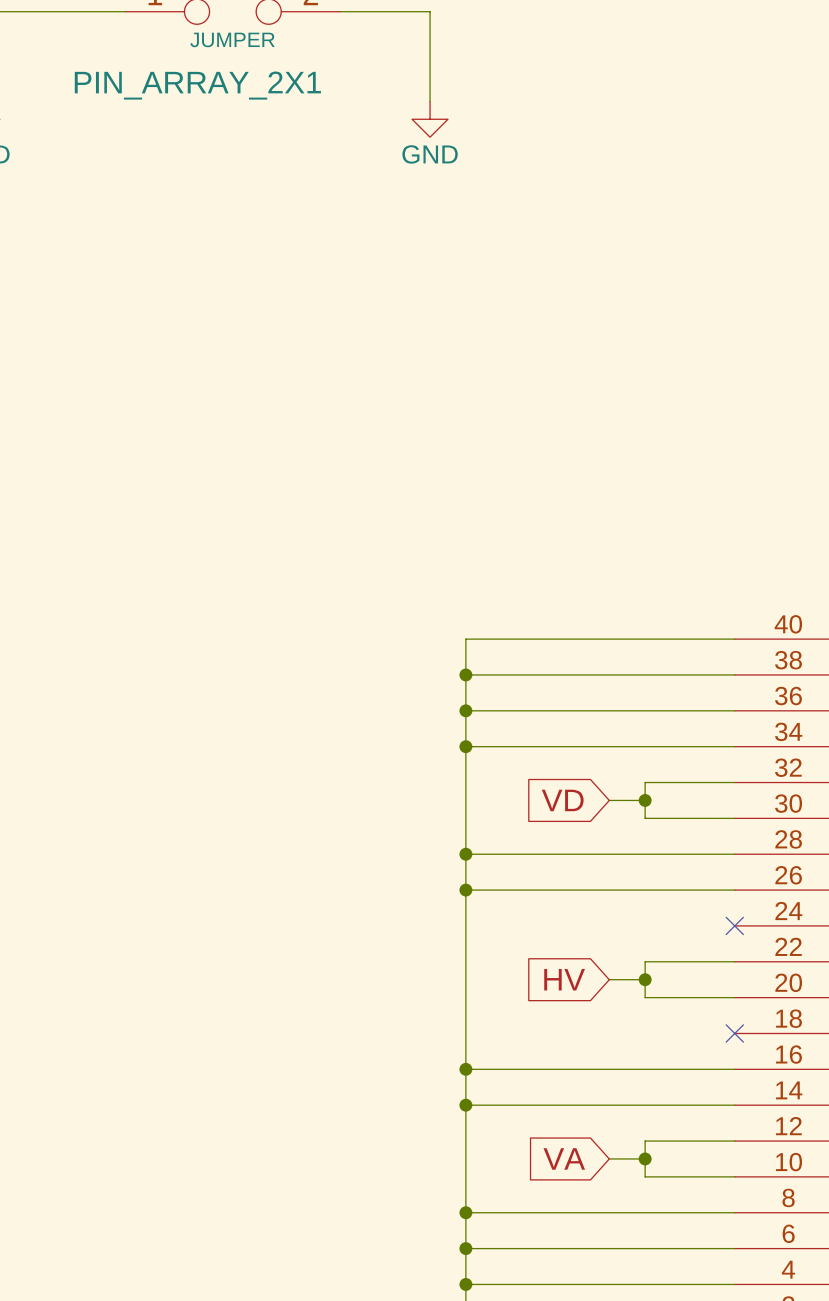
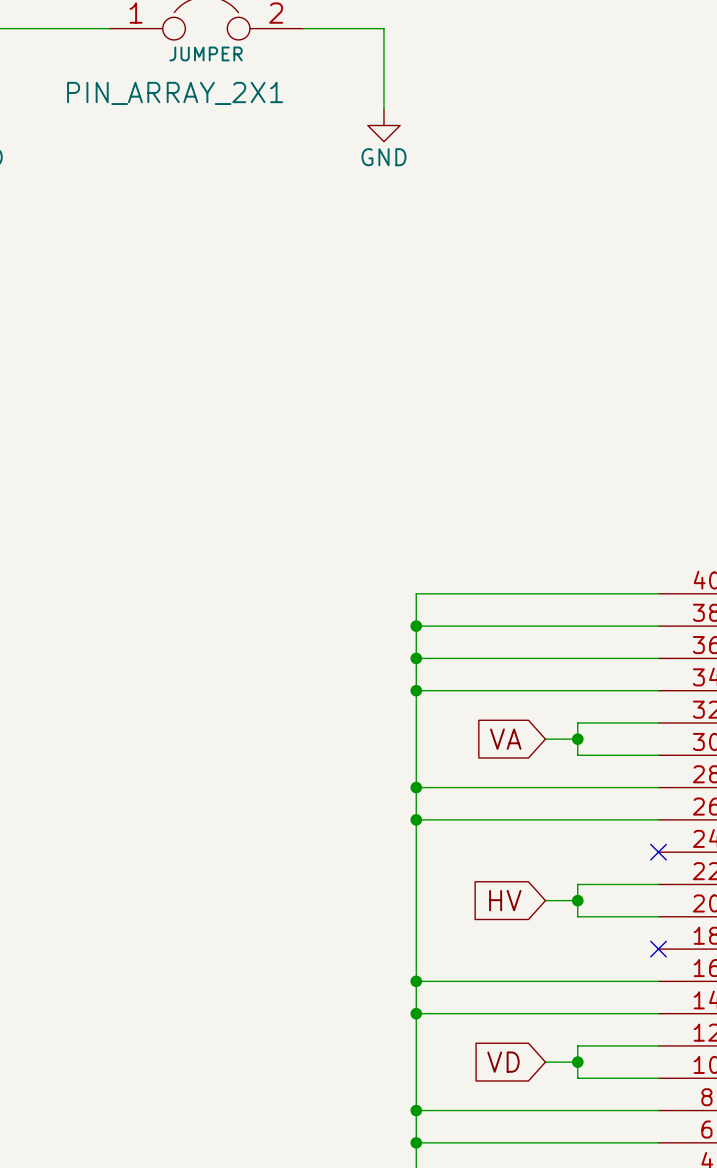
global label: VD (562, 800) -> VA (505, 739)
global label: VA (564, 1158) -> VD (503, 1062)

